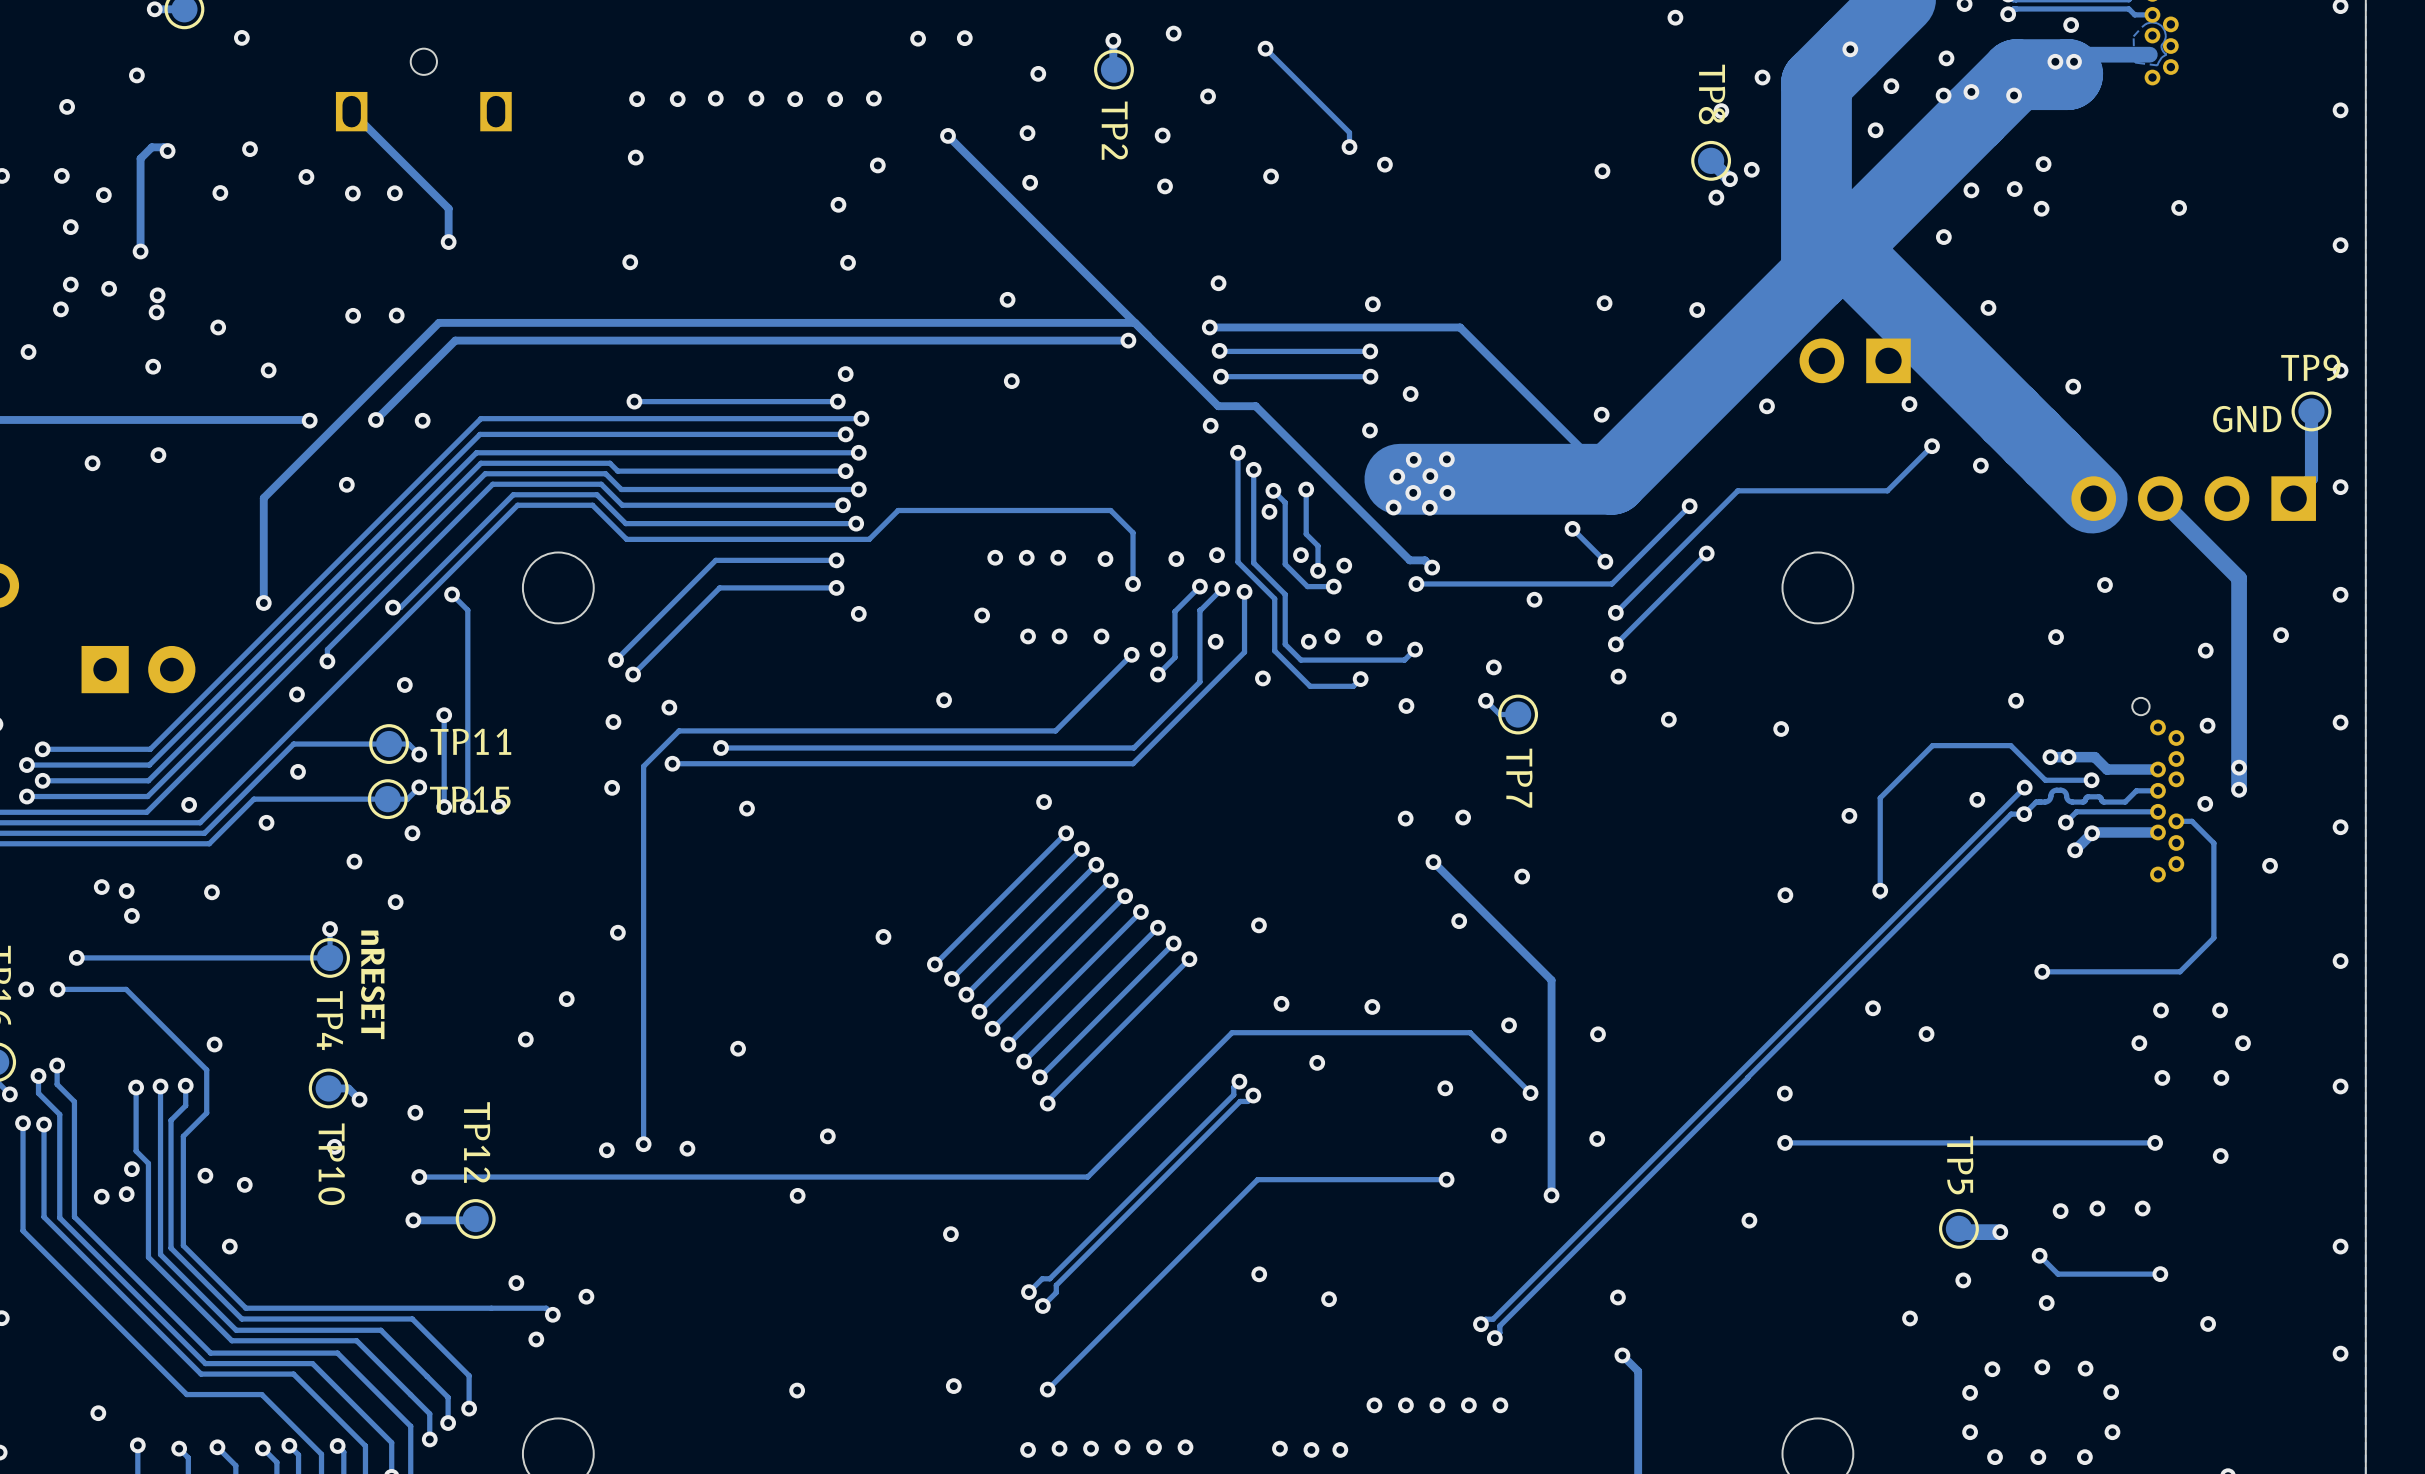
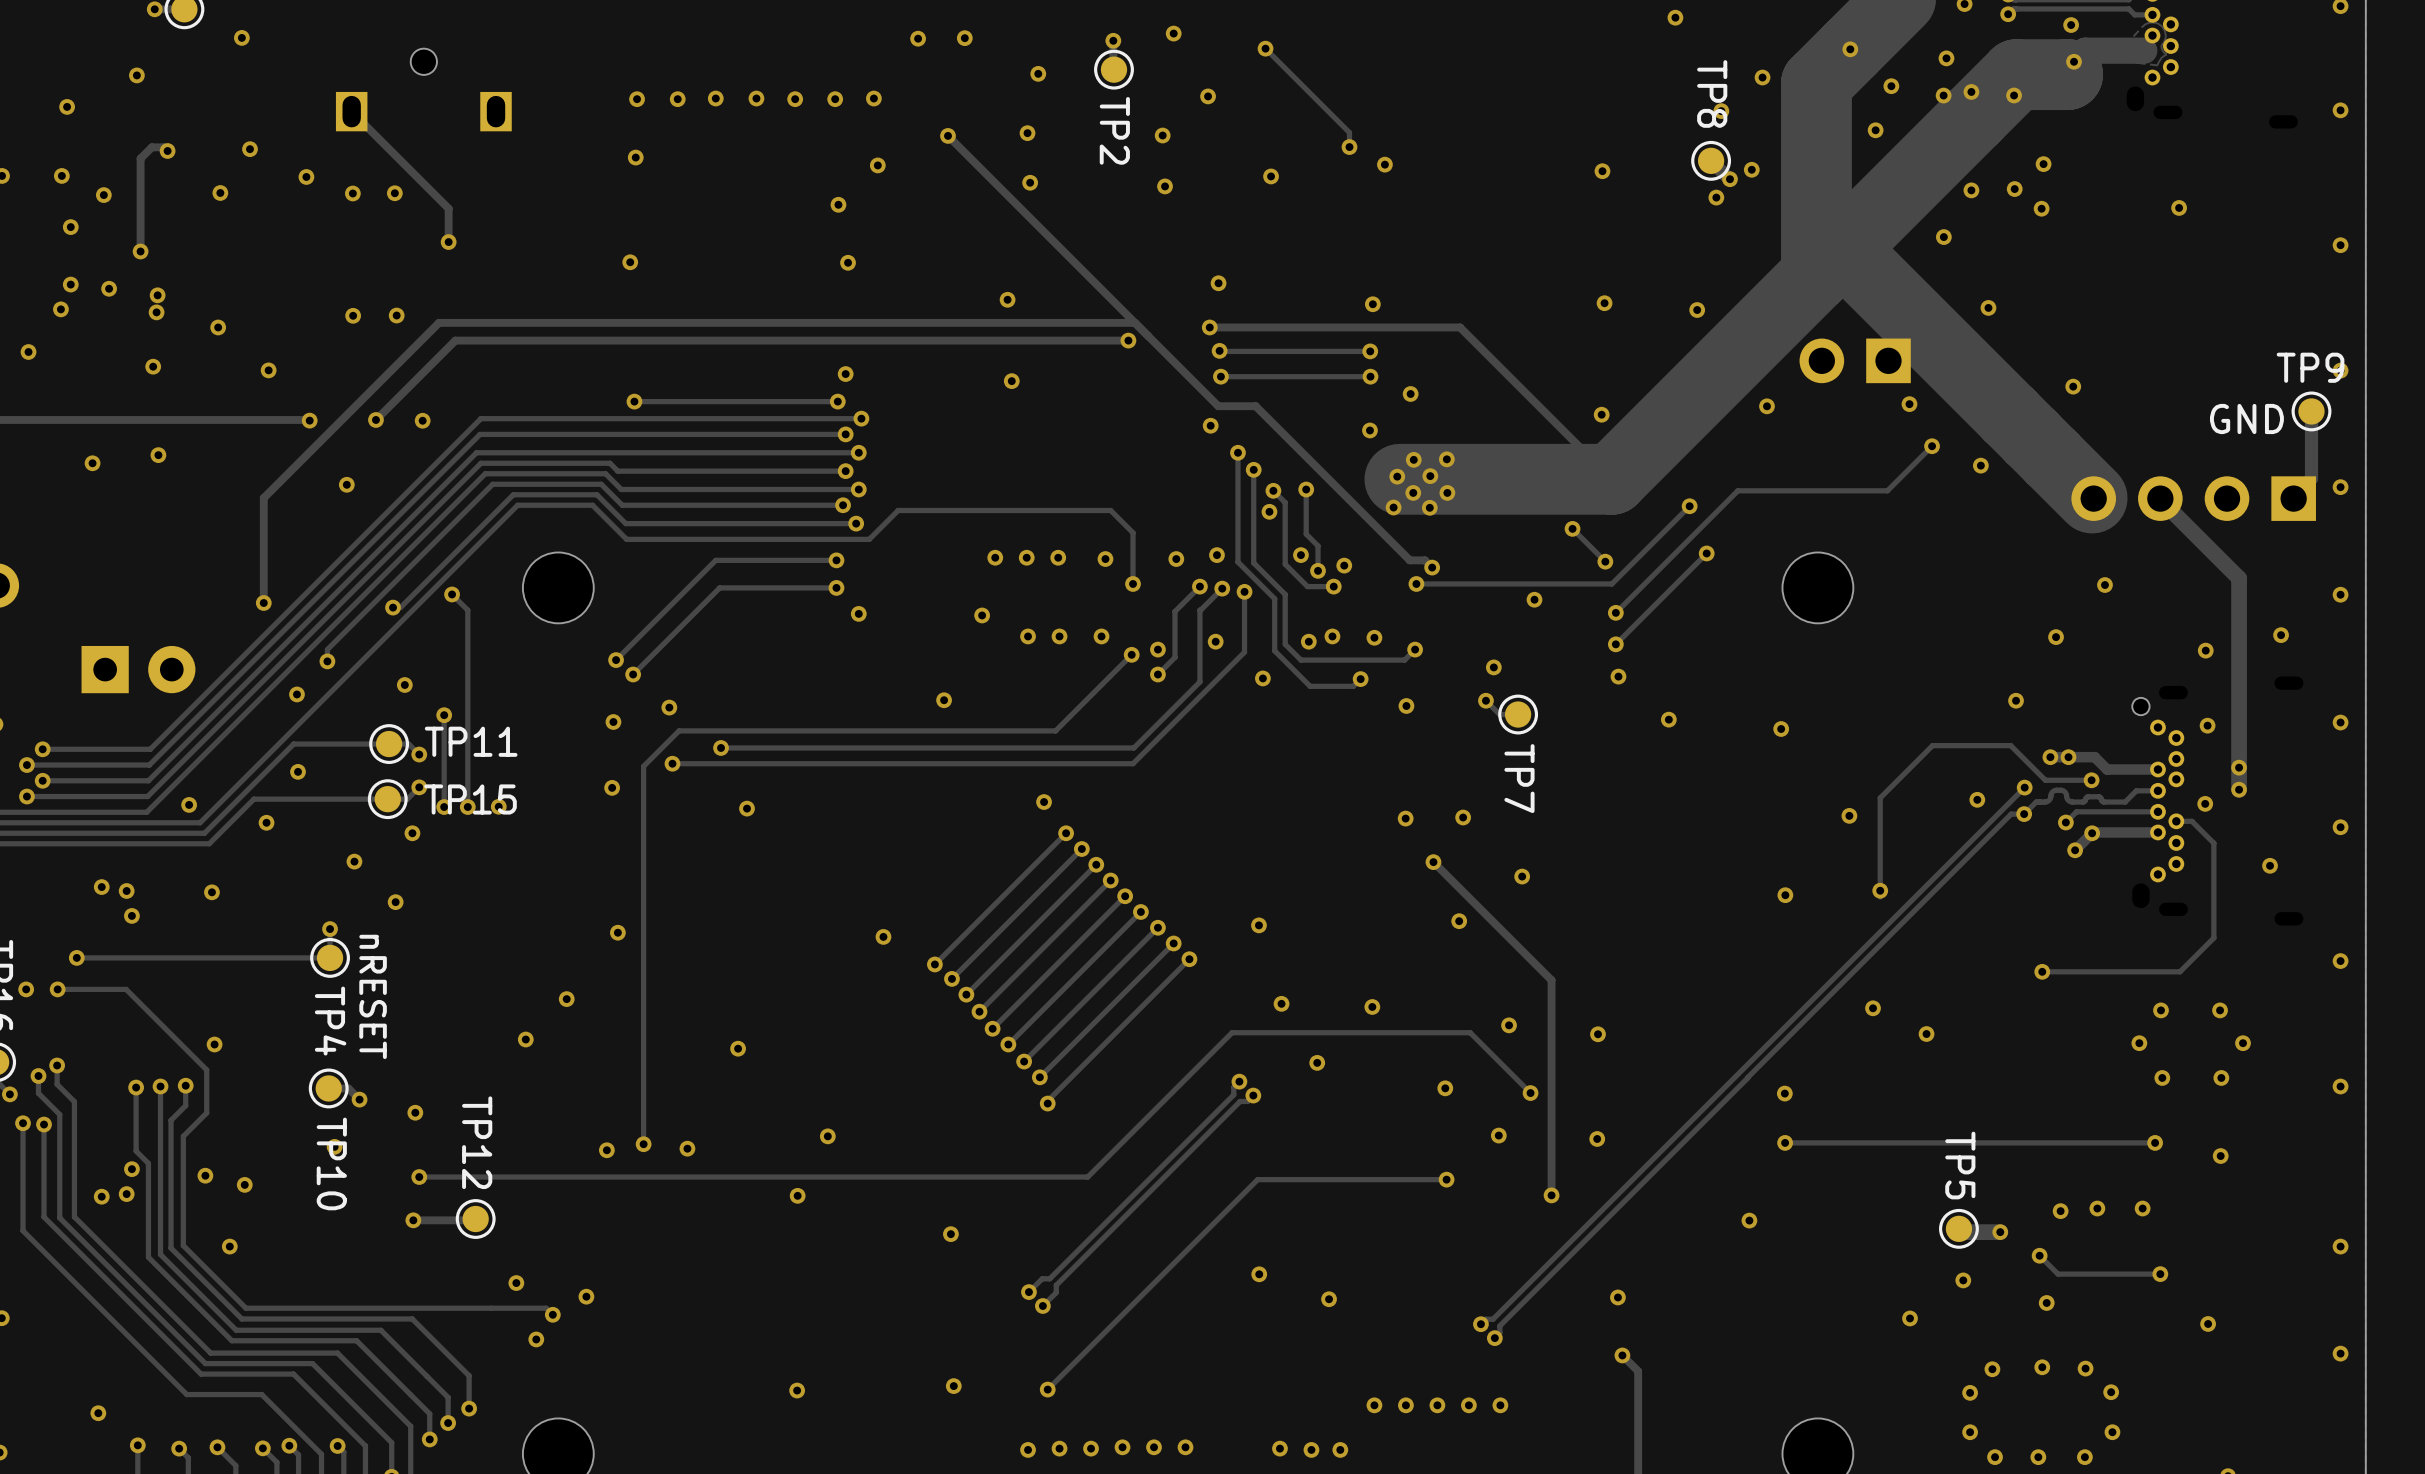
track: none -> (2144, 50) (2085, 50) (2074, 61)
track: (2149, 54) (2062, 54) -> none
via: (2055, 61) -> none

